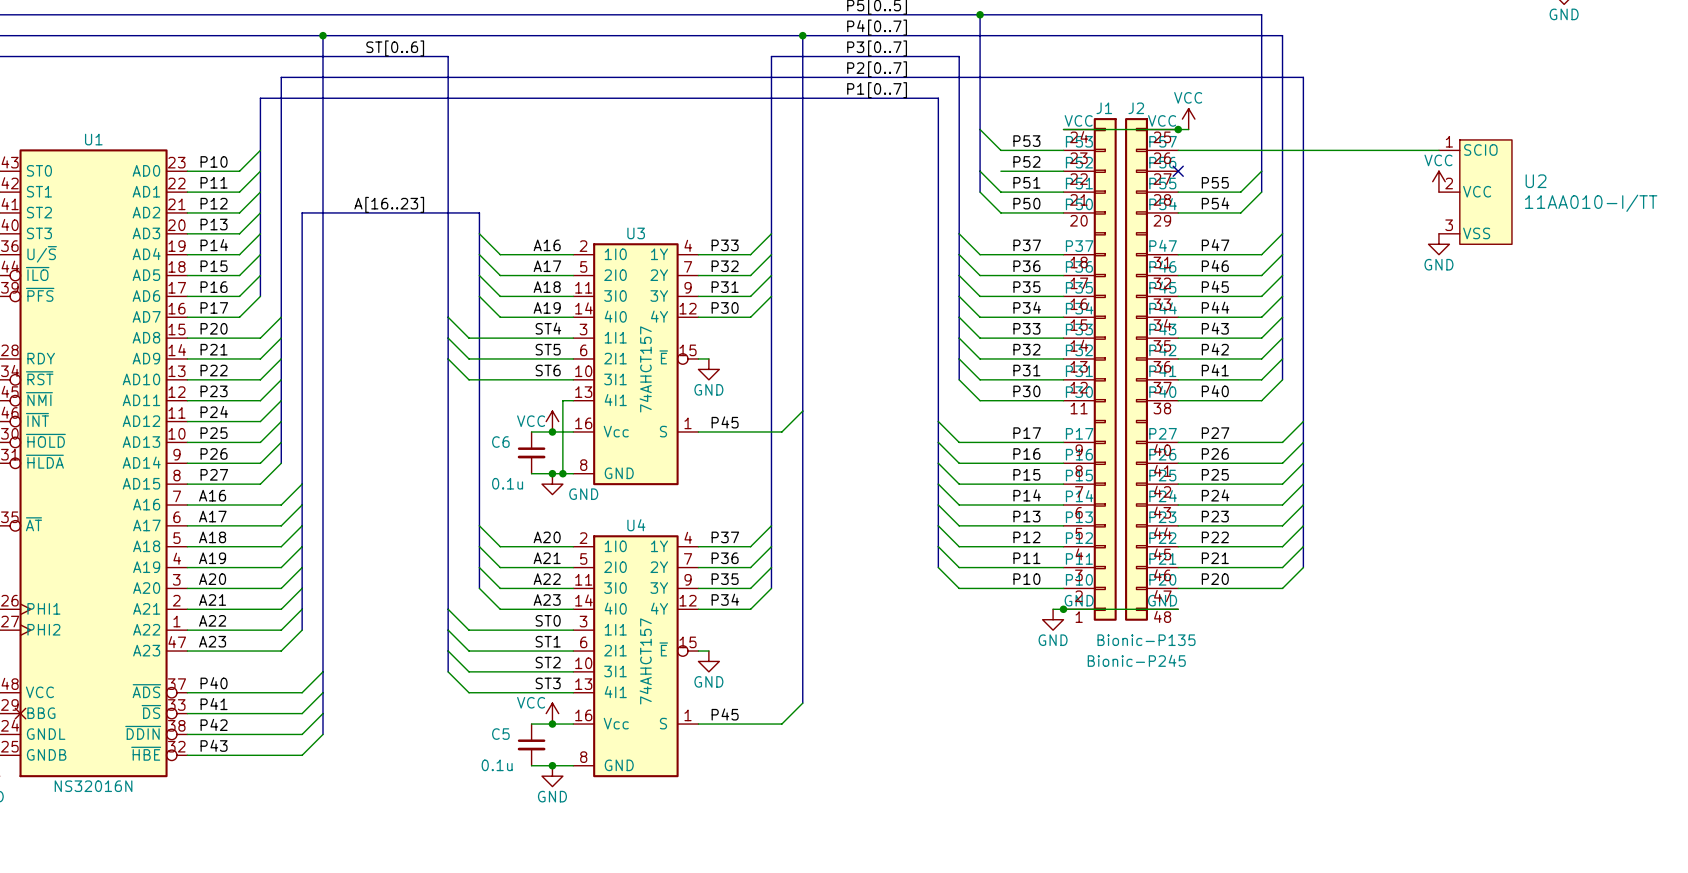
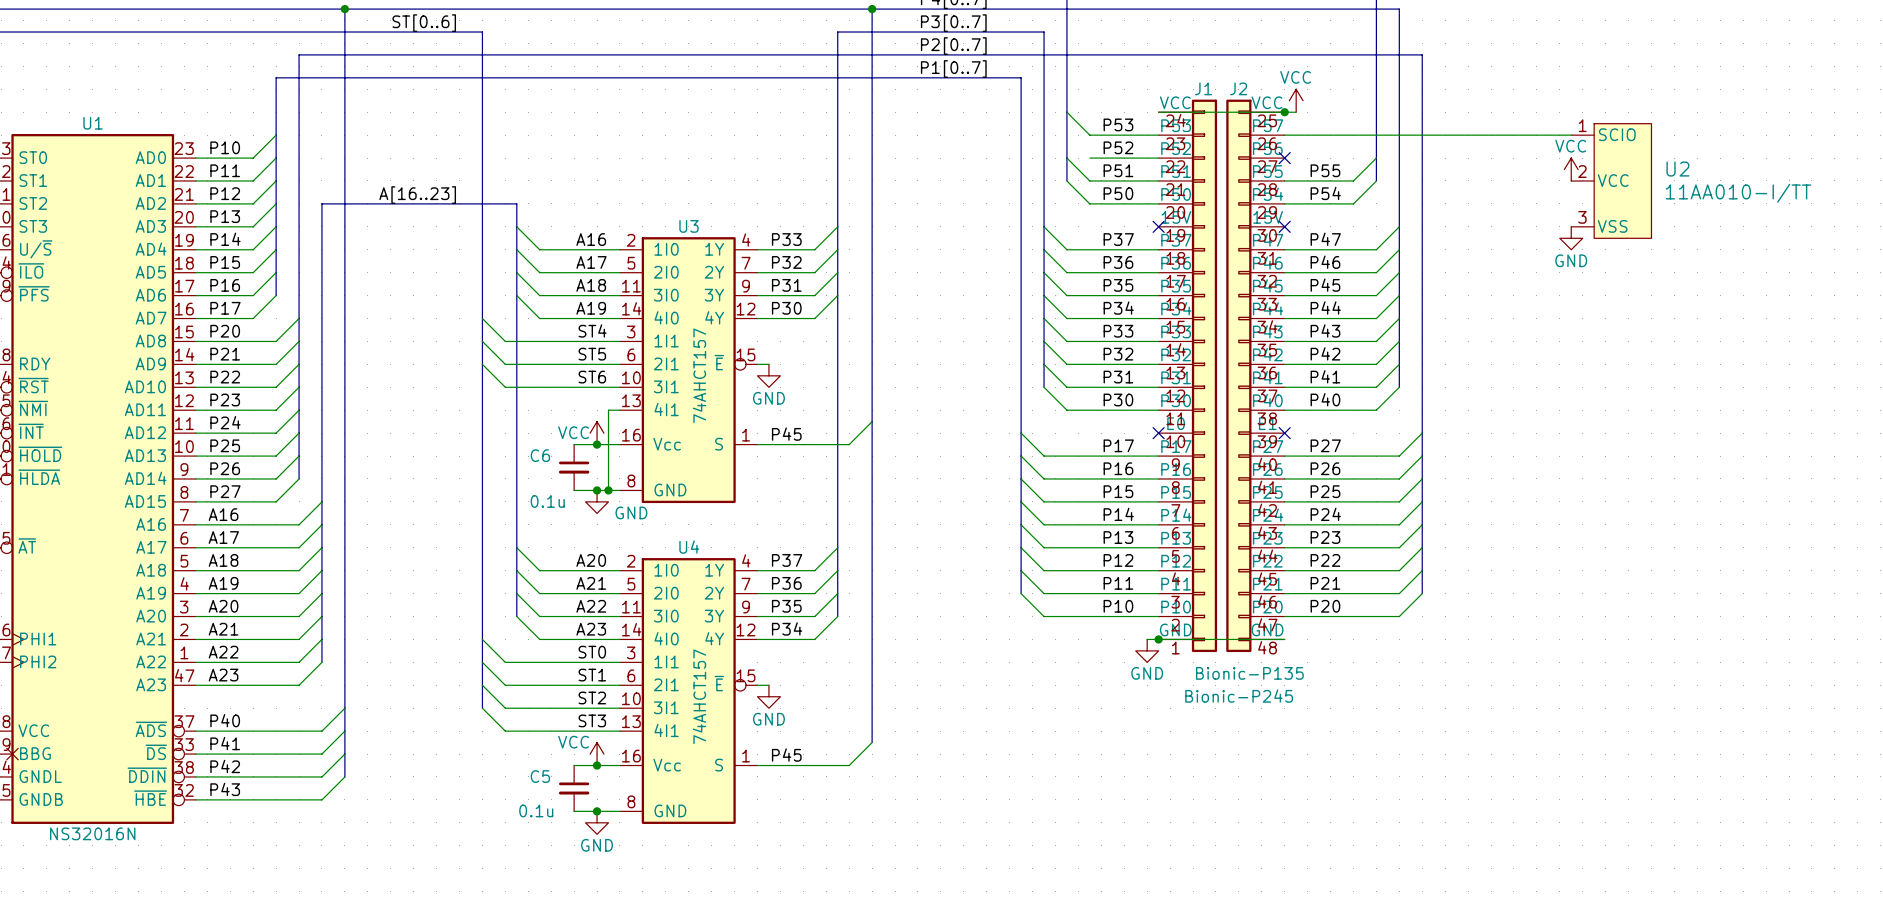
J1 symbol: [1063, 118, 1117, 621] -> [1158, 99, 1218, 653]
J2 symbol: [1125, 118, 1179, 621] -> [1226, 99, 1285, 653]
no-connect mark: none -> (1158, 226)
no-connect mark: none -> (1284, 226)
no-connect mark: none -> (1158, 433)
no-connect mark: none -> (1284, 433)

